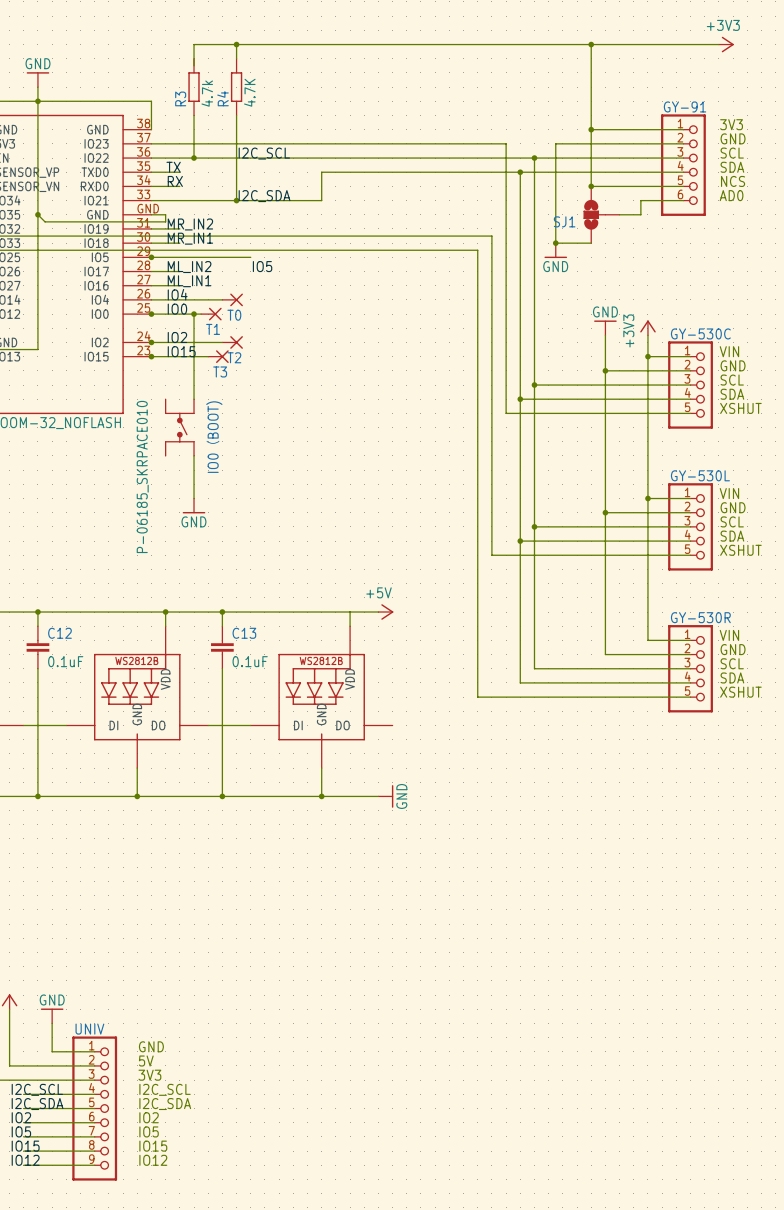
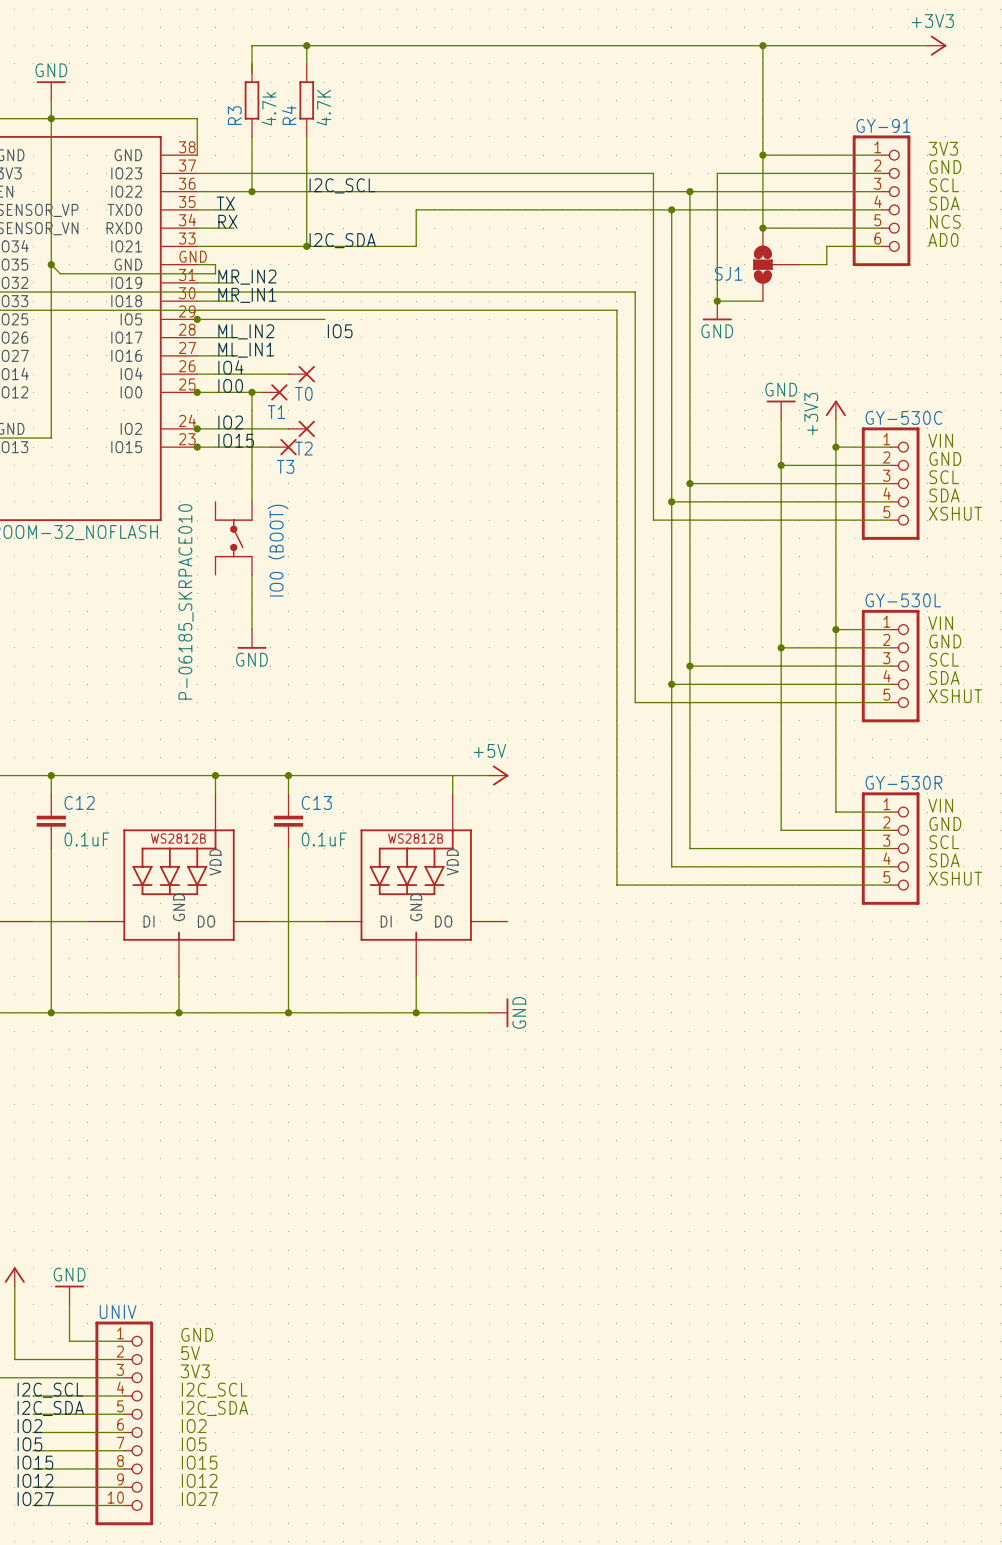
UNIV: (94, 1108) -> none
UNIV: none -> (124, 1423)
label: none -> IO27 (35, 1499)
text: none -> IO27 (199, 1499)
wire: none -> (33, 1505) (124, 1505)

